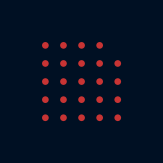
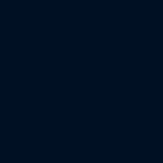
part: (81, 81) -> none

